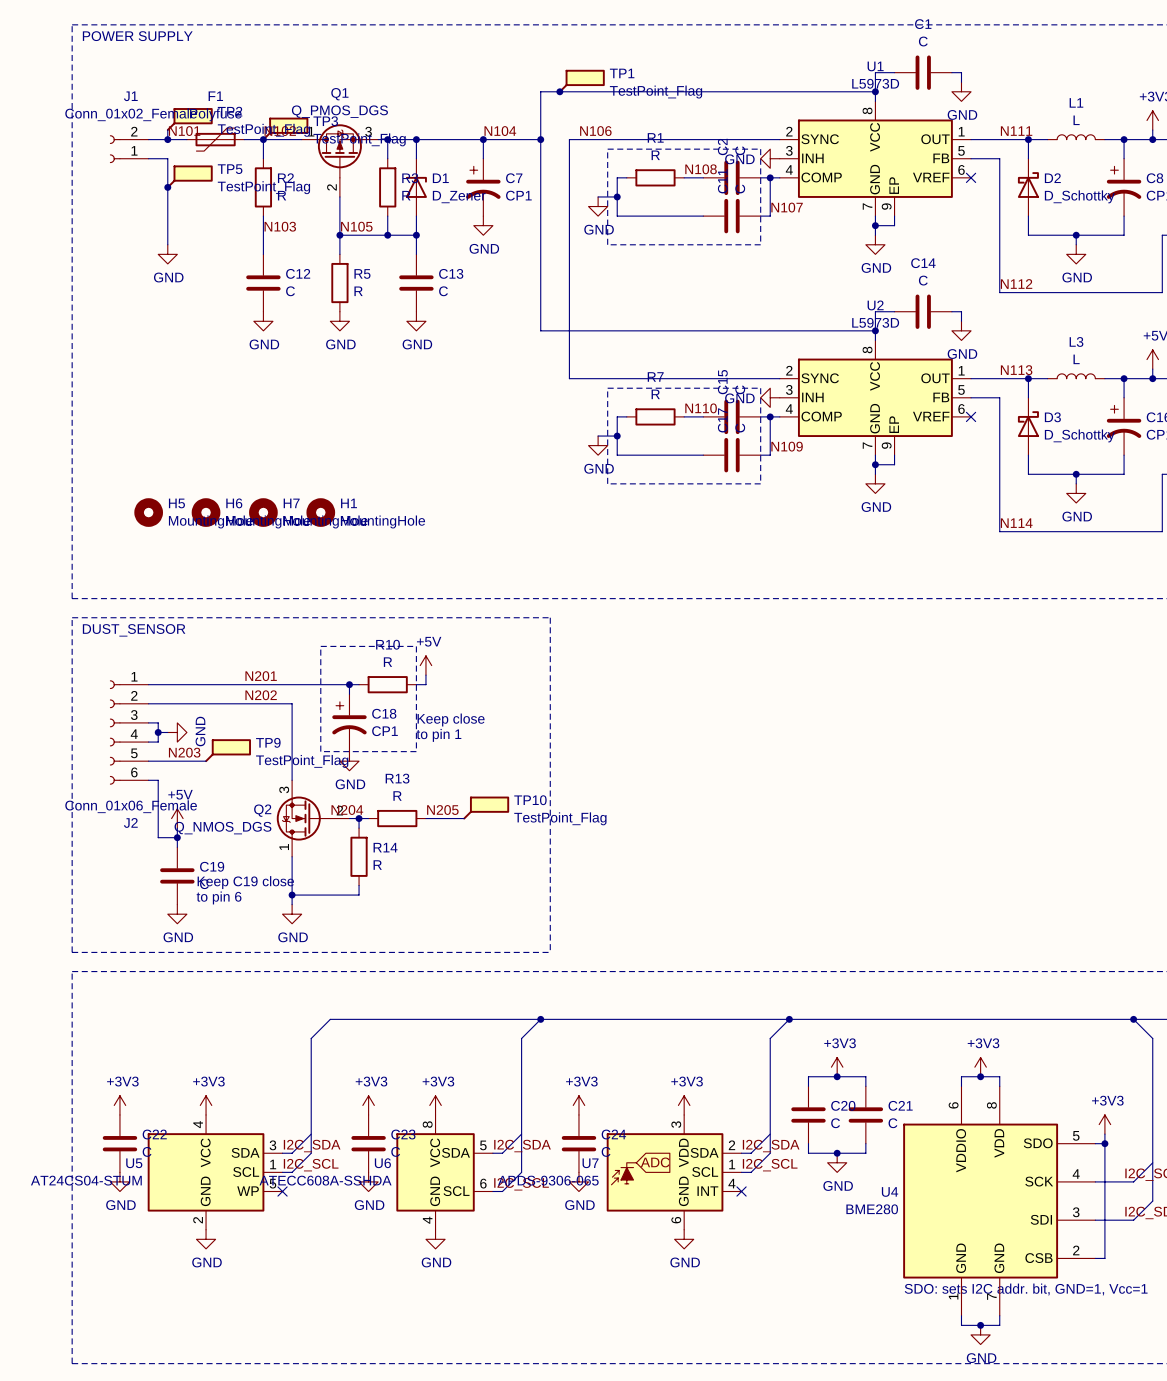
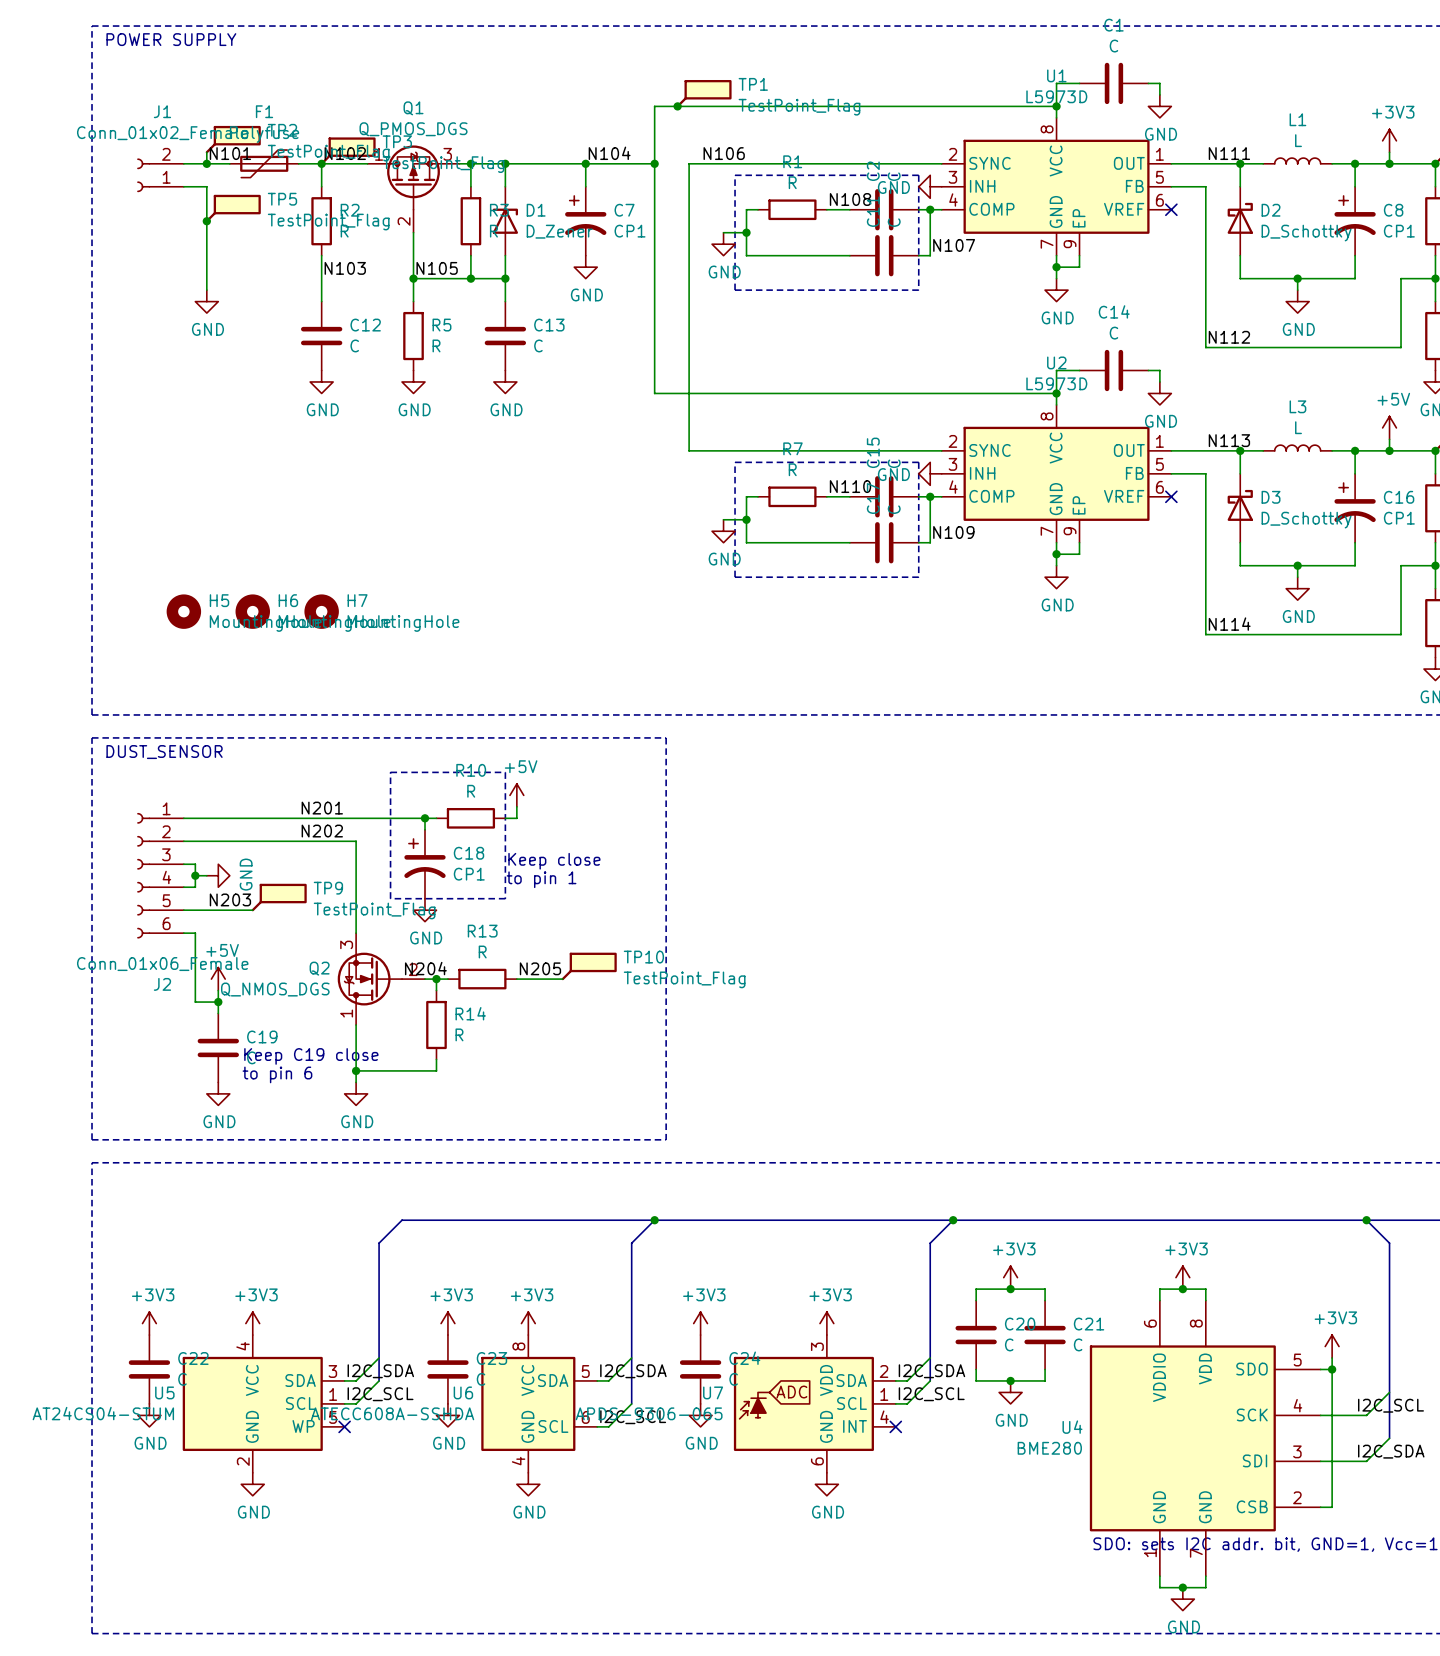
H1: MountingHole (320, 512) -> none

